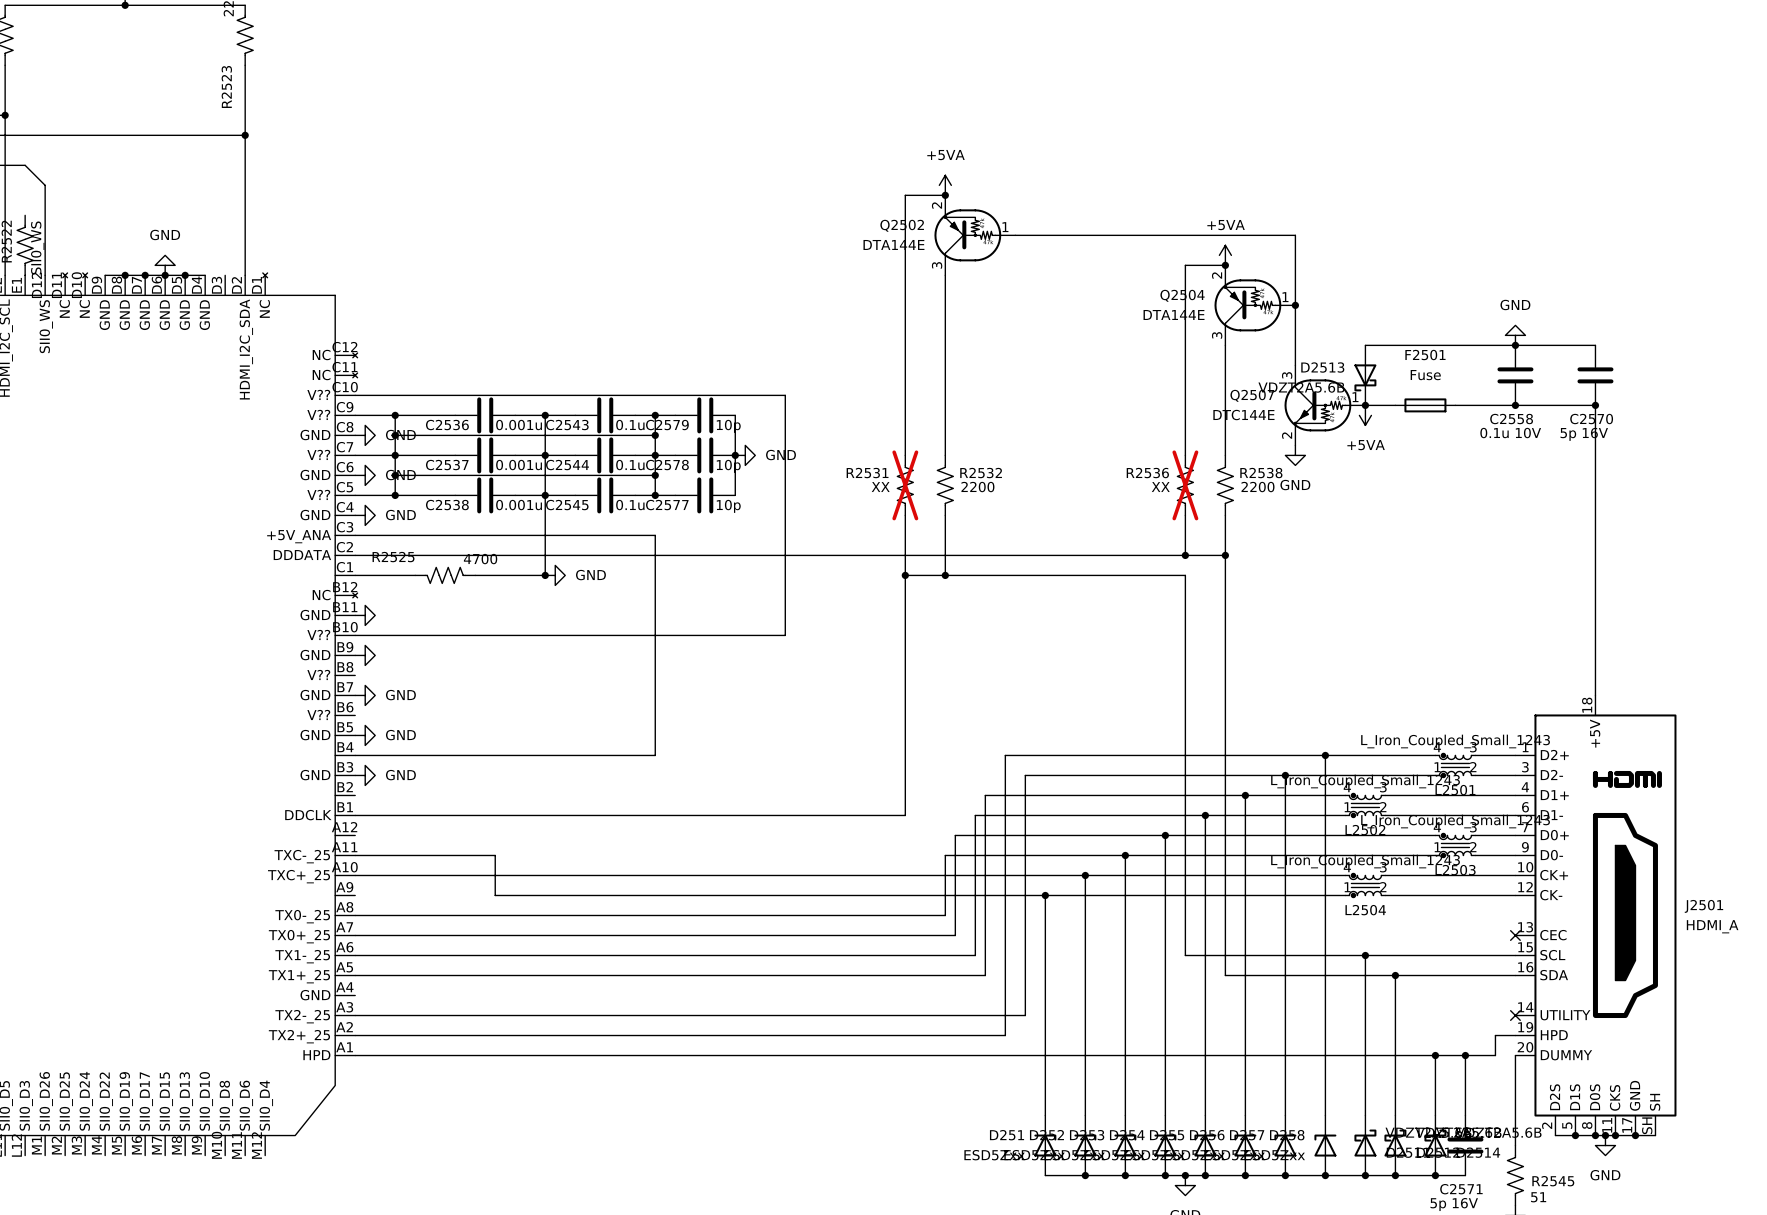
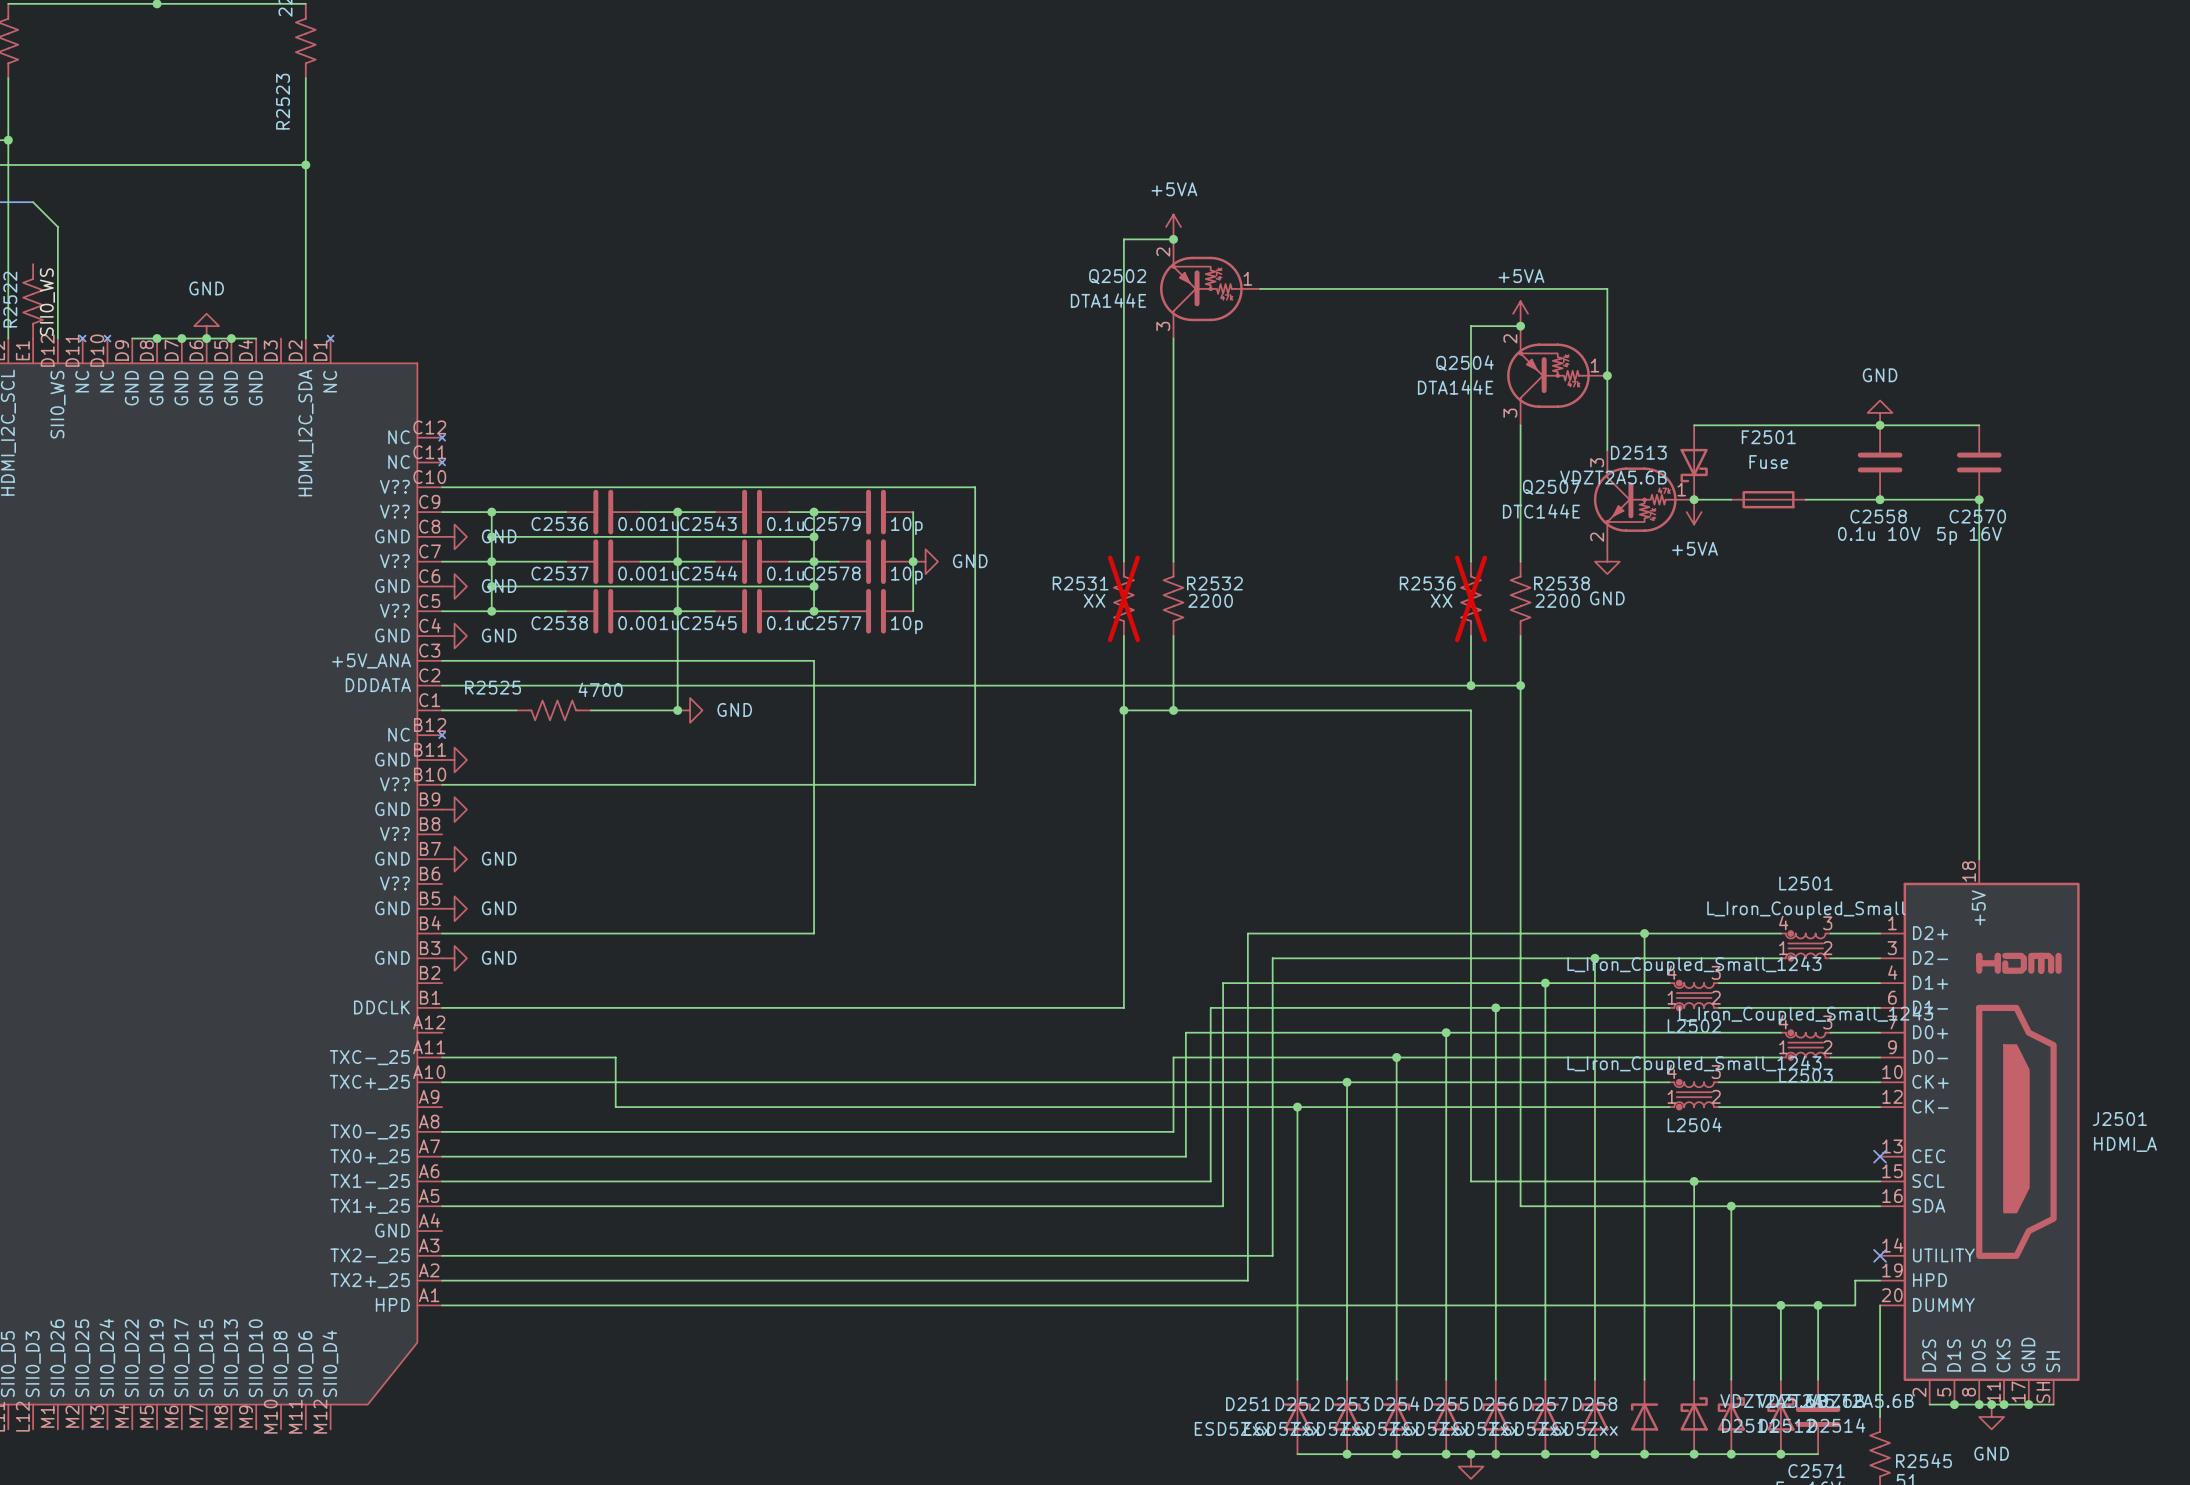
L2501 value: L_Iron_Coupled_Small_1243 (1455, 741) -> L_Iron_Coupled_Small (1806, 910)
L2501 name position: L2501 (1455, 790) -> L2501 (1805, 883)

